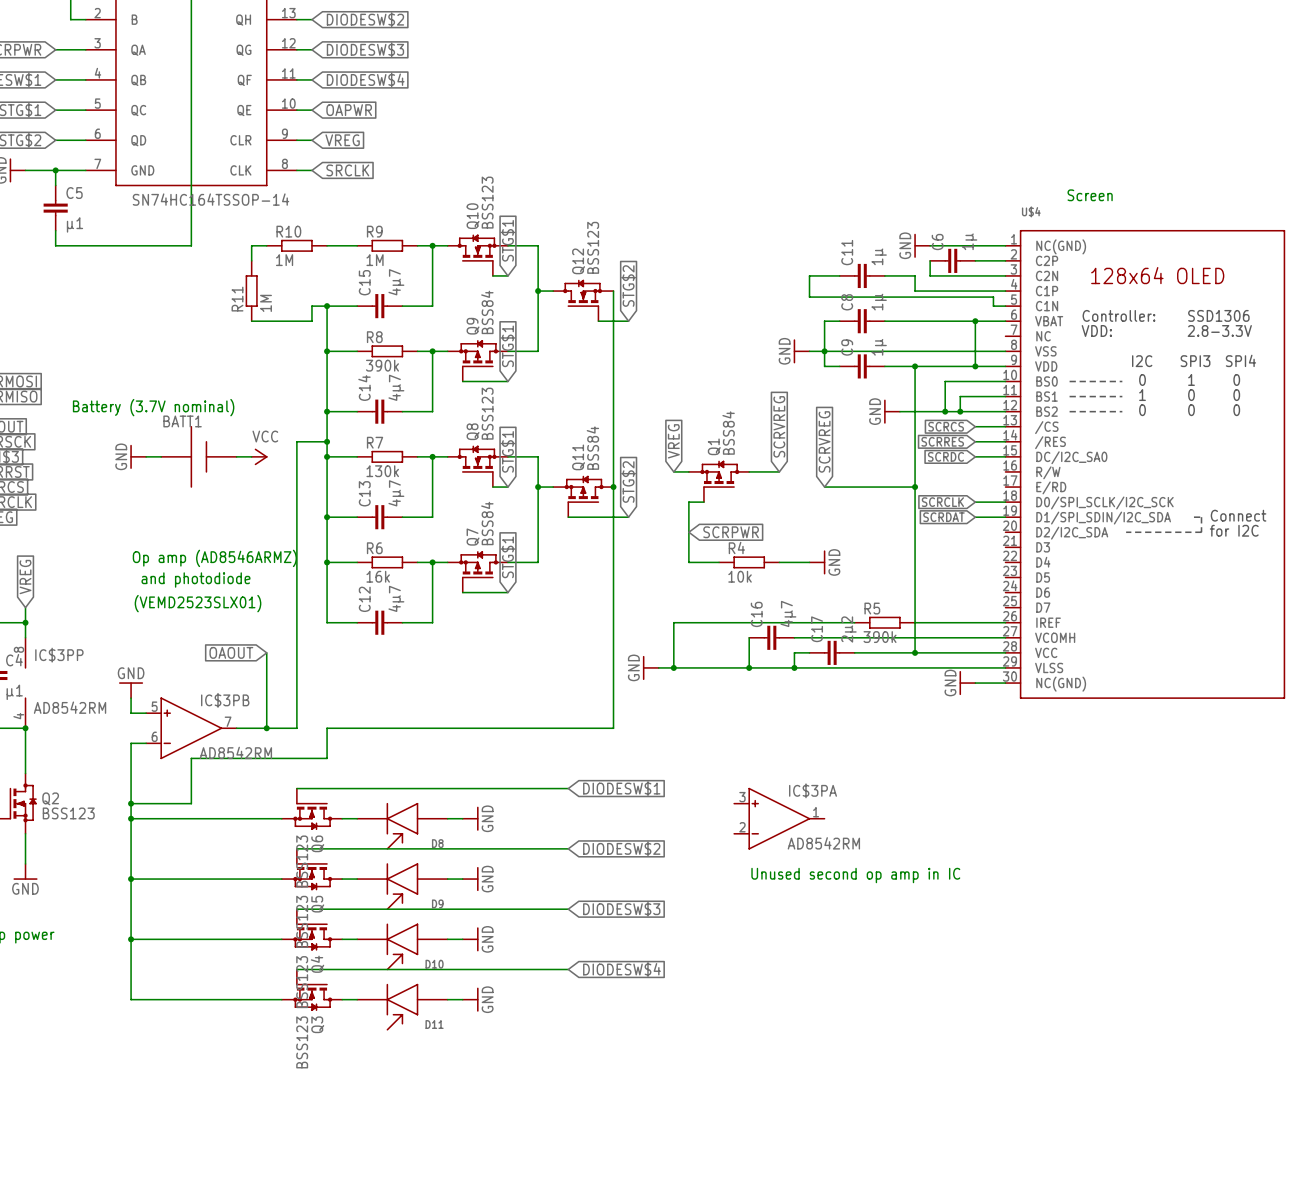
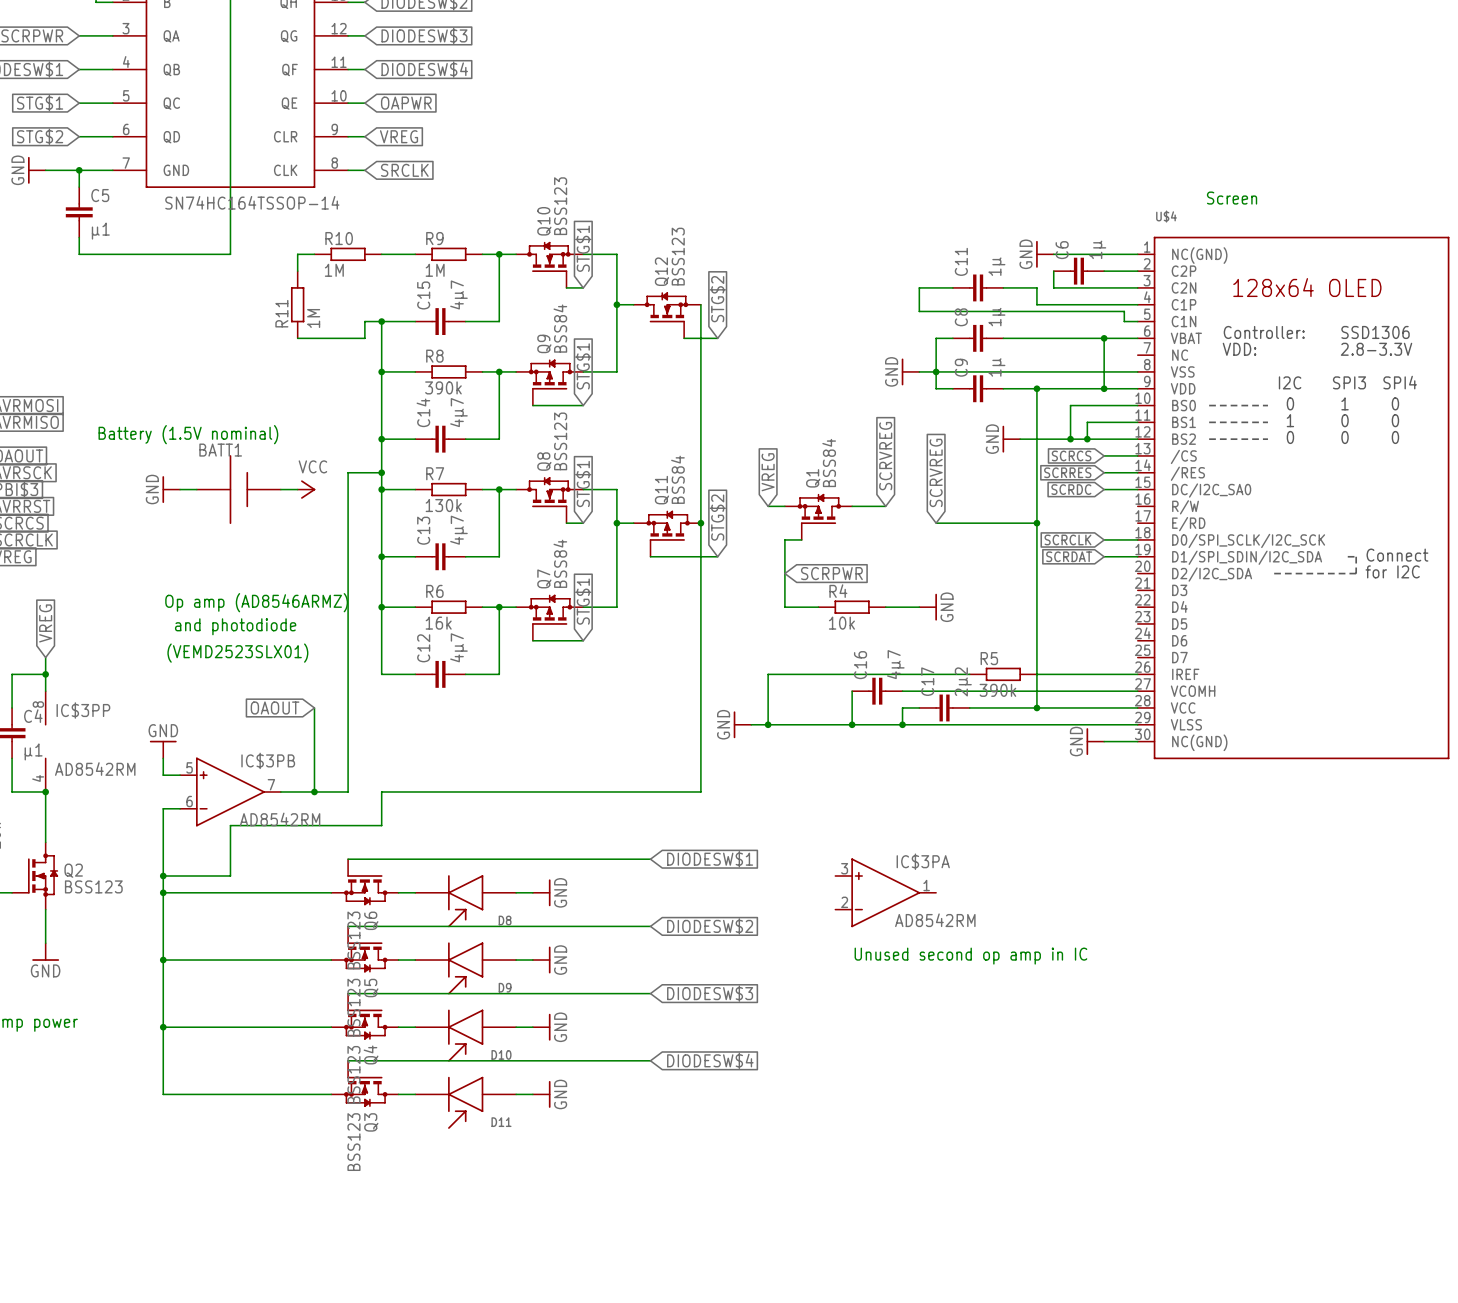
text: Battery (3.7V nominal) (153, 407) -> Battery (1.5V nominal) (188, 434)

